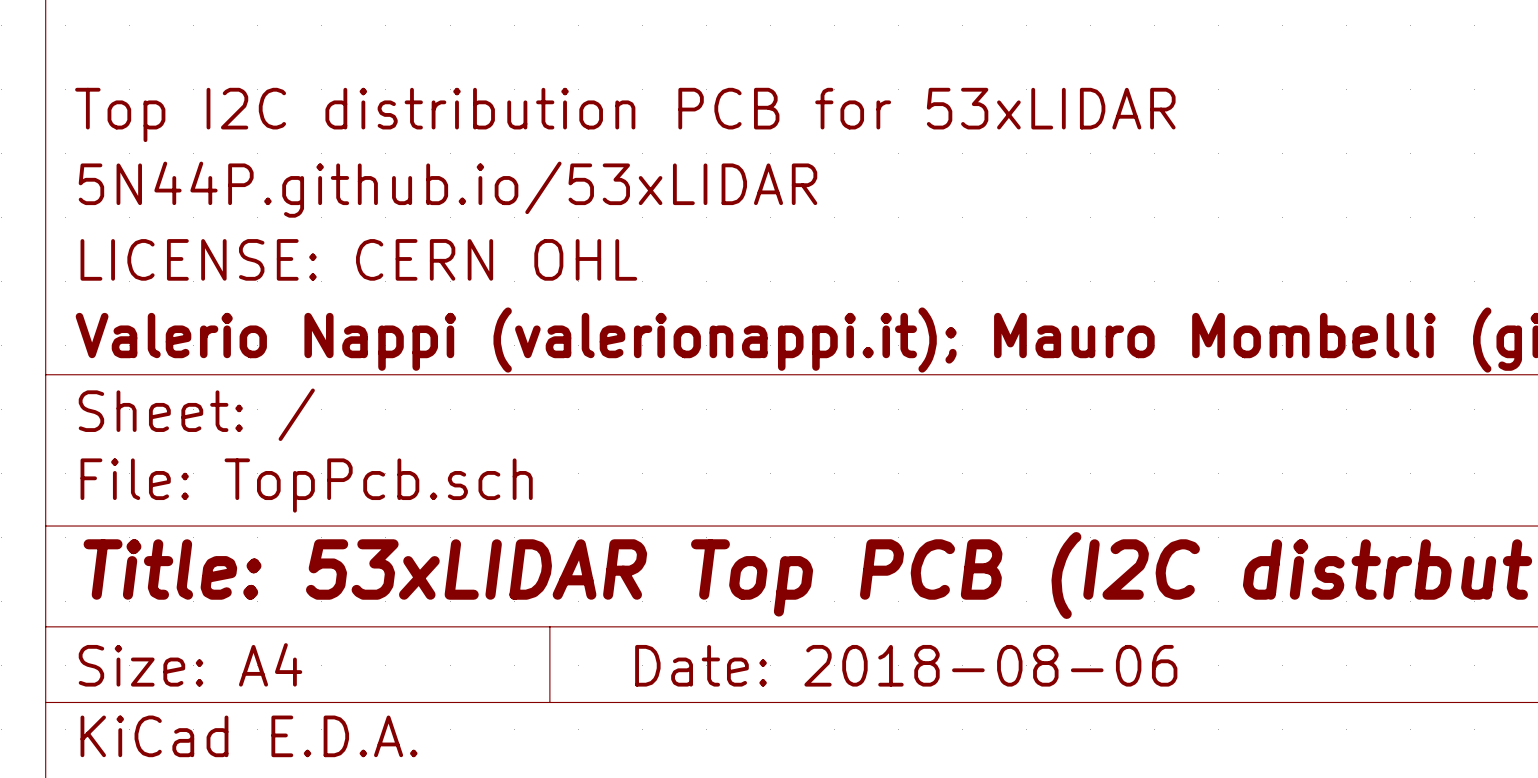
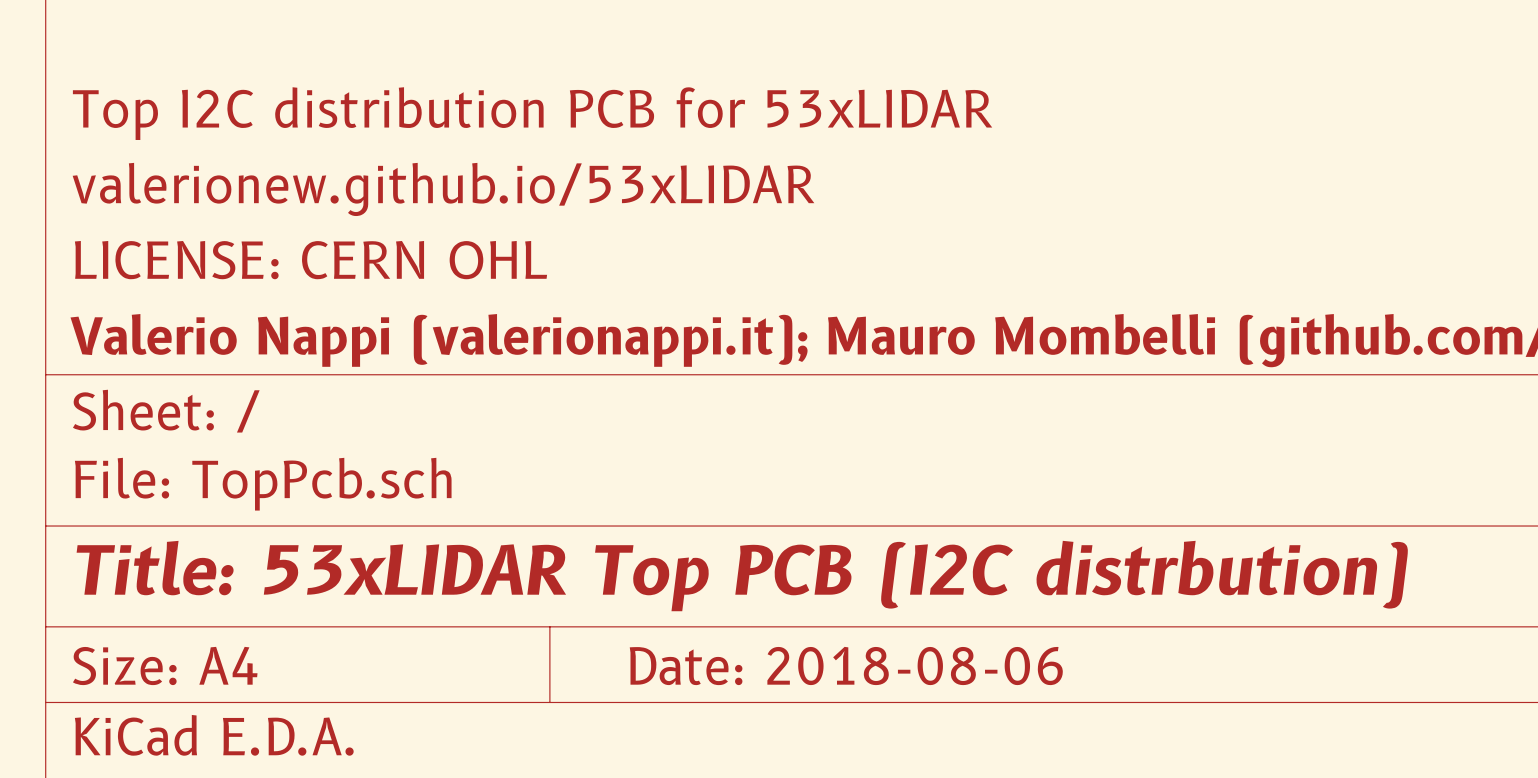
title block: 5N44P.github.io/53xLIDAR (447, 189) -> valerionew.github.io/53xLIDAR (443, 189)

